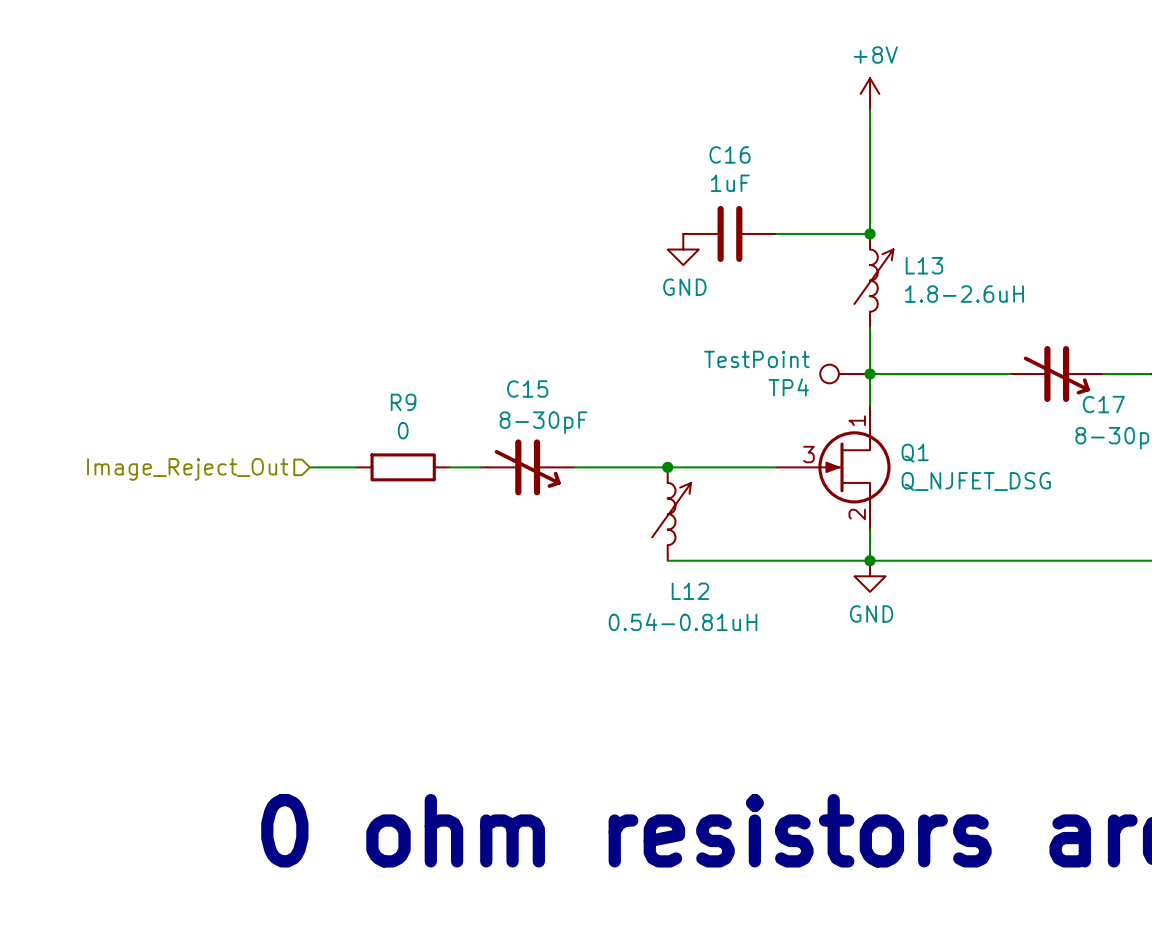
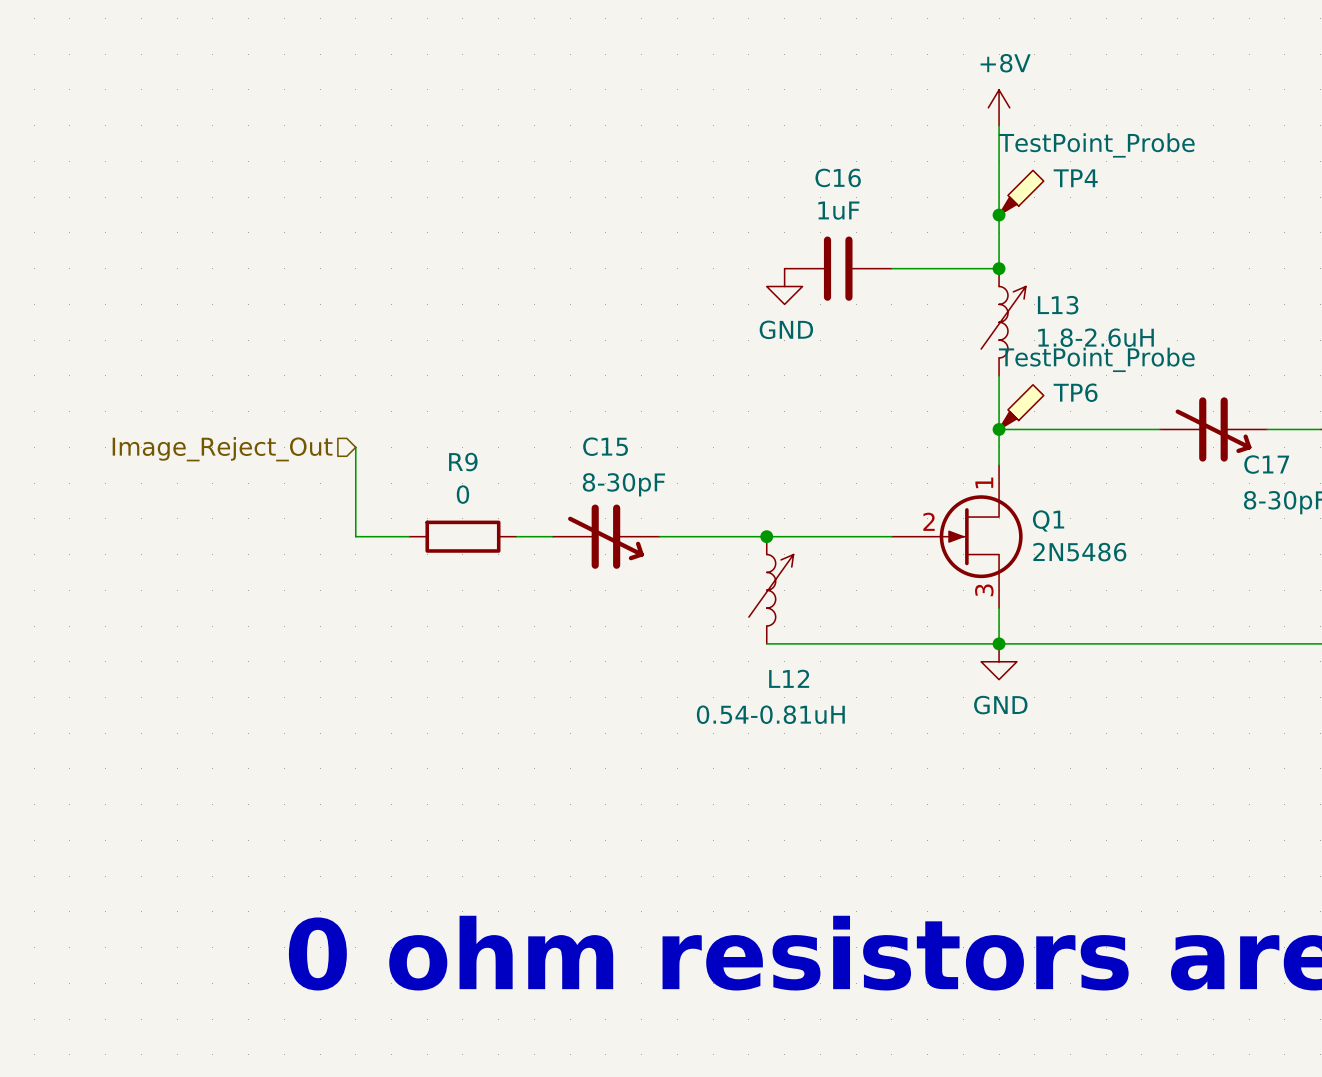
junction: none -> (999, 215)
TP6: none -> TestPoint_Probe (1021, 407)
TP4 value: TestPoint (756, 359) -> TestPoint_Probe (1096, 145)
TP4 symbol: [820, 364, 871, 384] -> [999, 170, 1044, 216]
TP4 name position: TP4 (788, 387) -> TP4 (1075, 178)
wire: none -> (355, 447) (355, 536)
Q1 pin number: 3 (808, 454) -> 2 (929, 521)
hierarchical label position: Image_Reject_Out (187, 469) -> Image_Reject_Out (222, 449)
Q1 value: Q_NJFET_DSG (976, 481) -> 2N5486 (1079, 552)
Q1 pin number: 2 (857, 514) -> 3 (984, 590)

